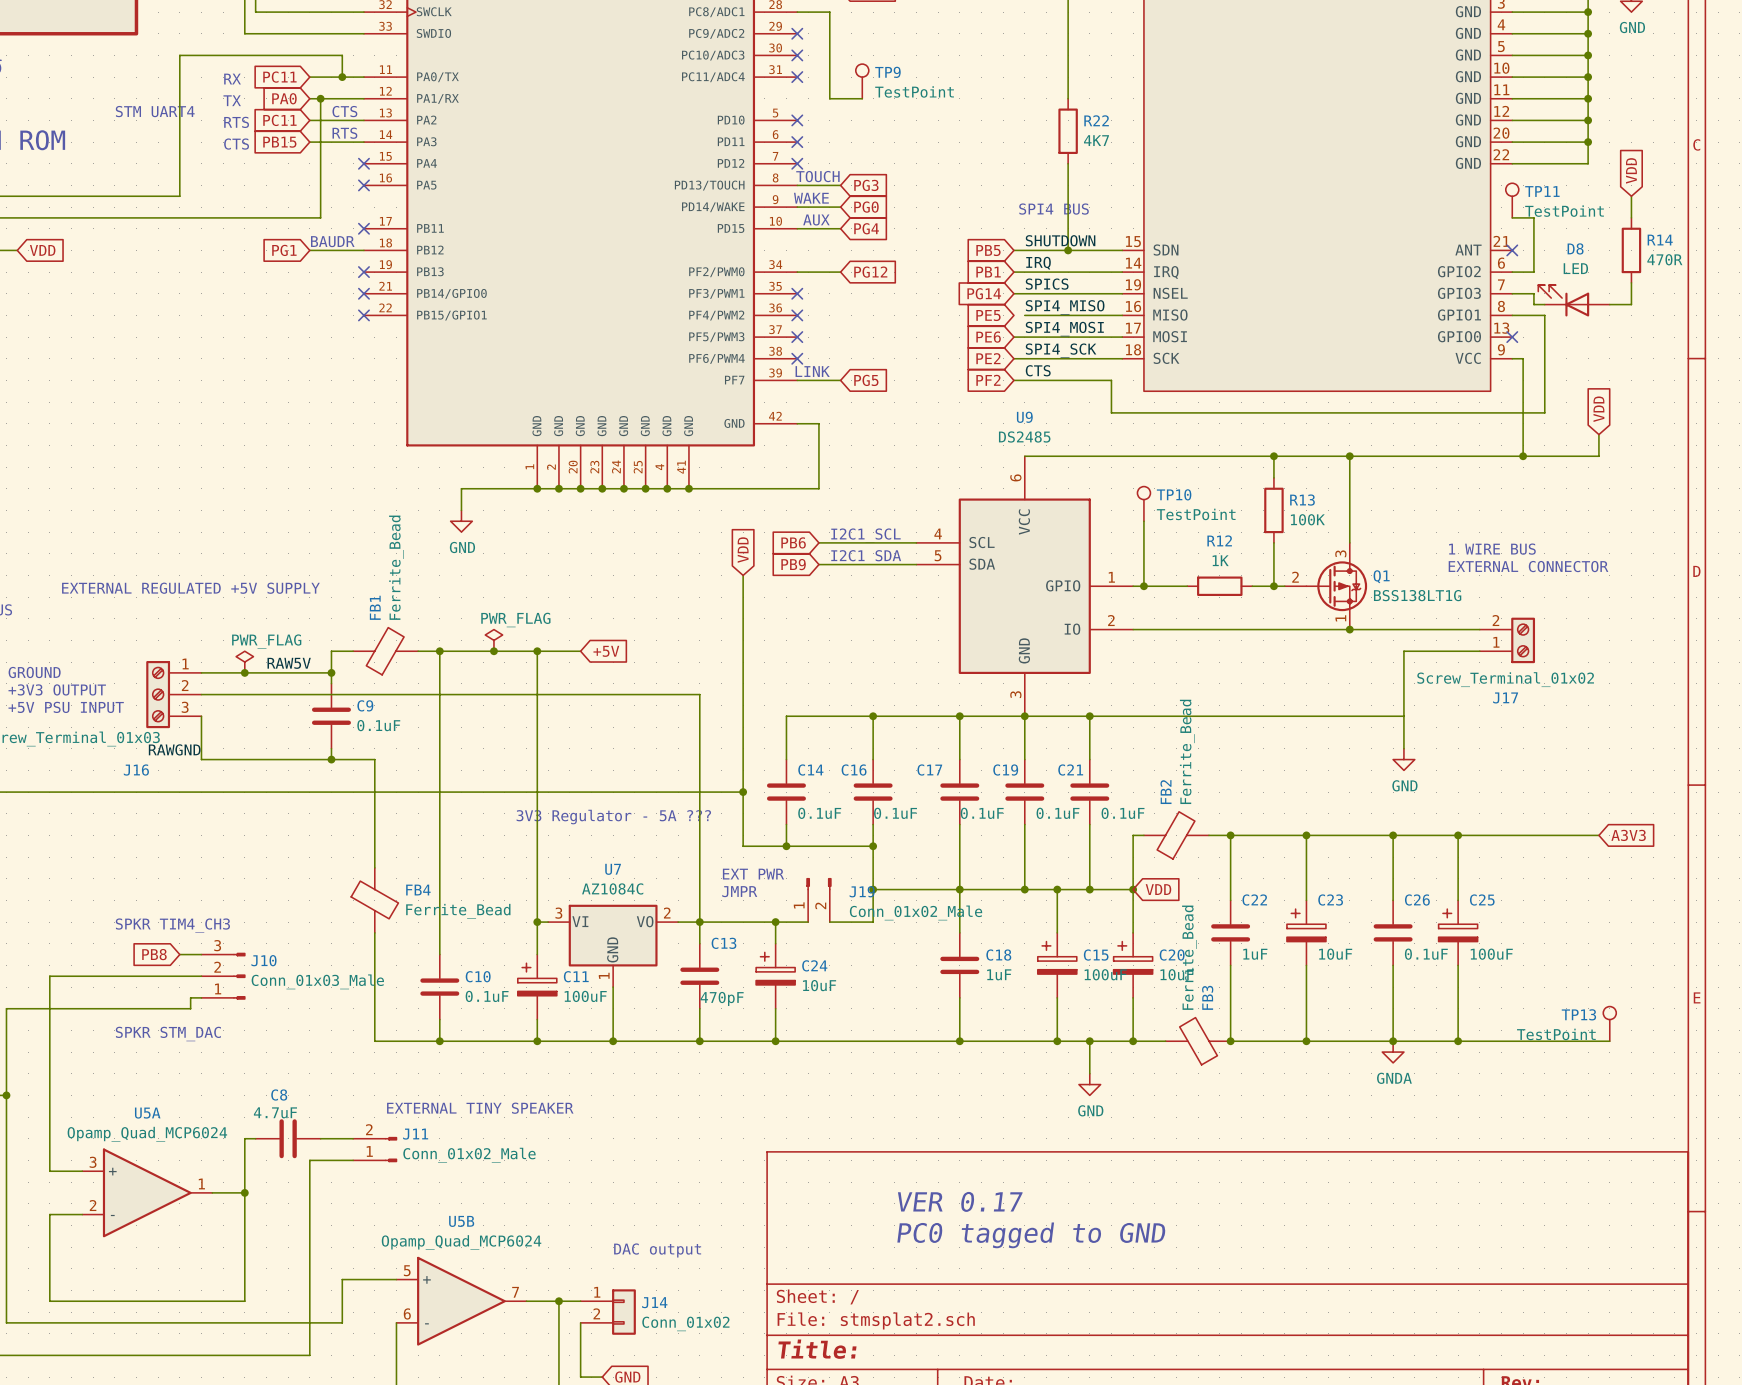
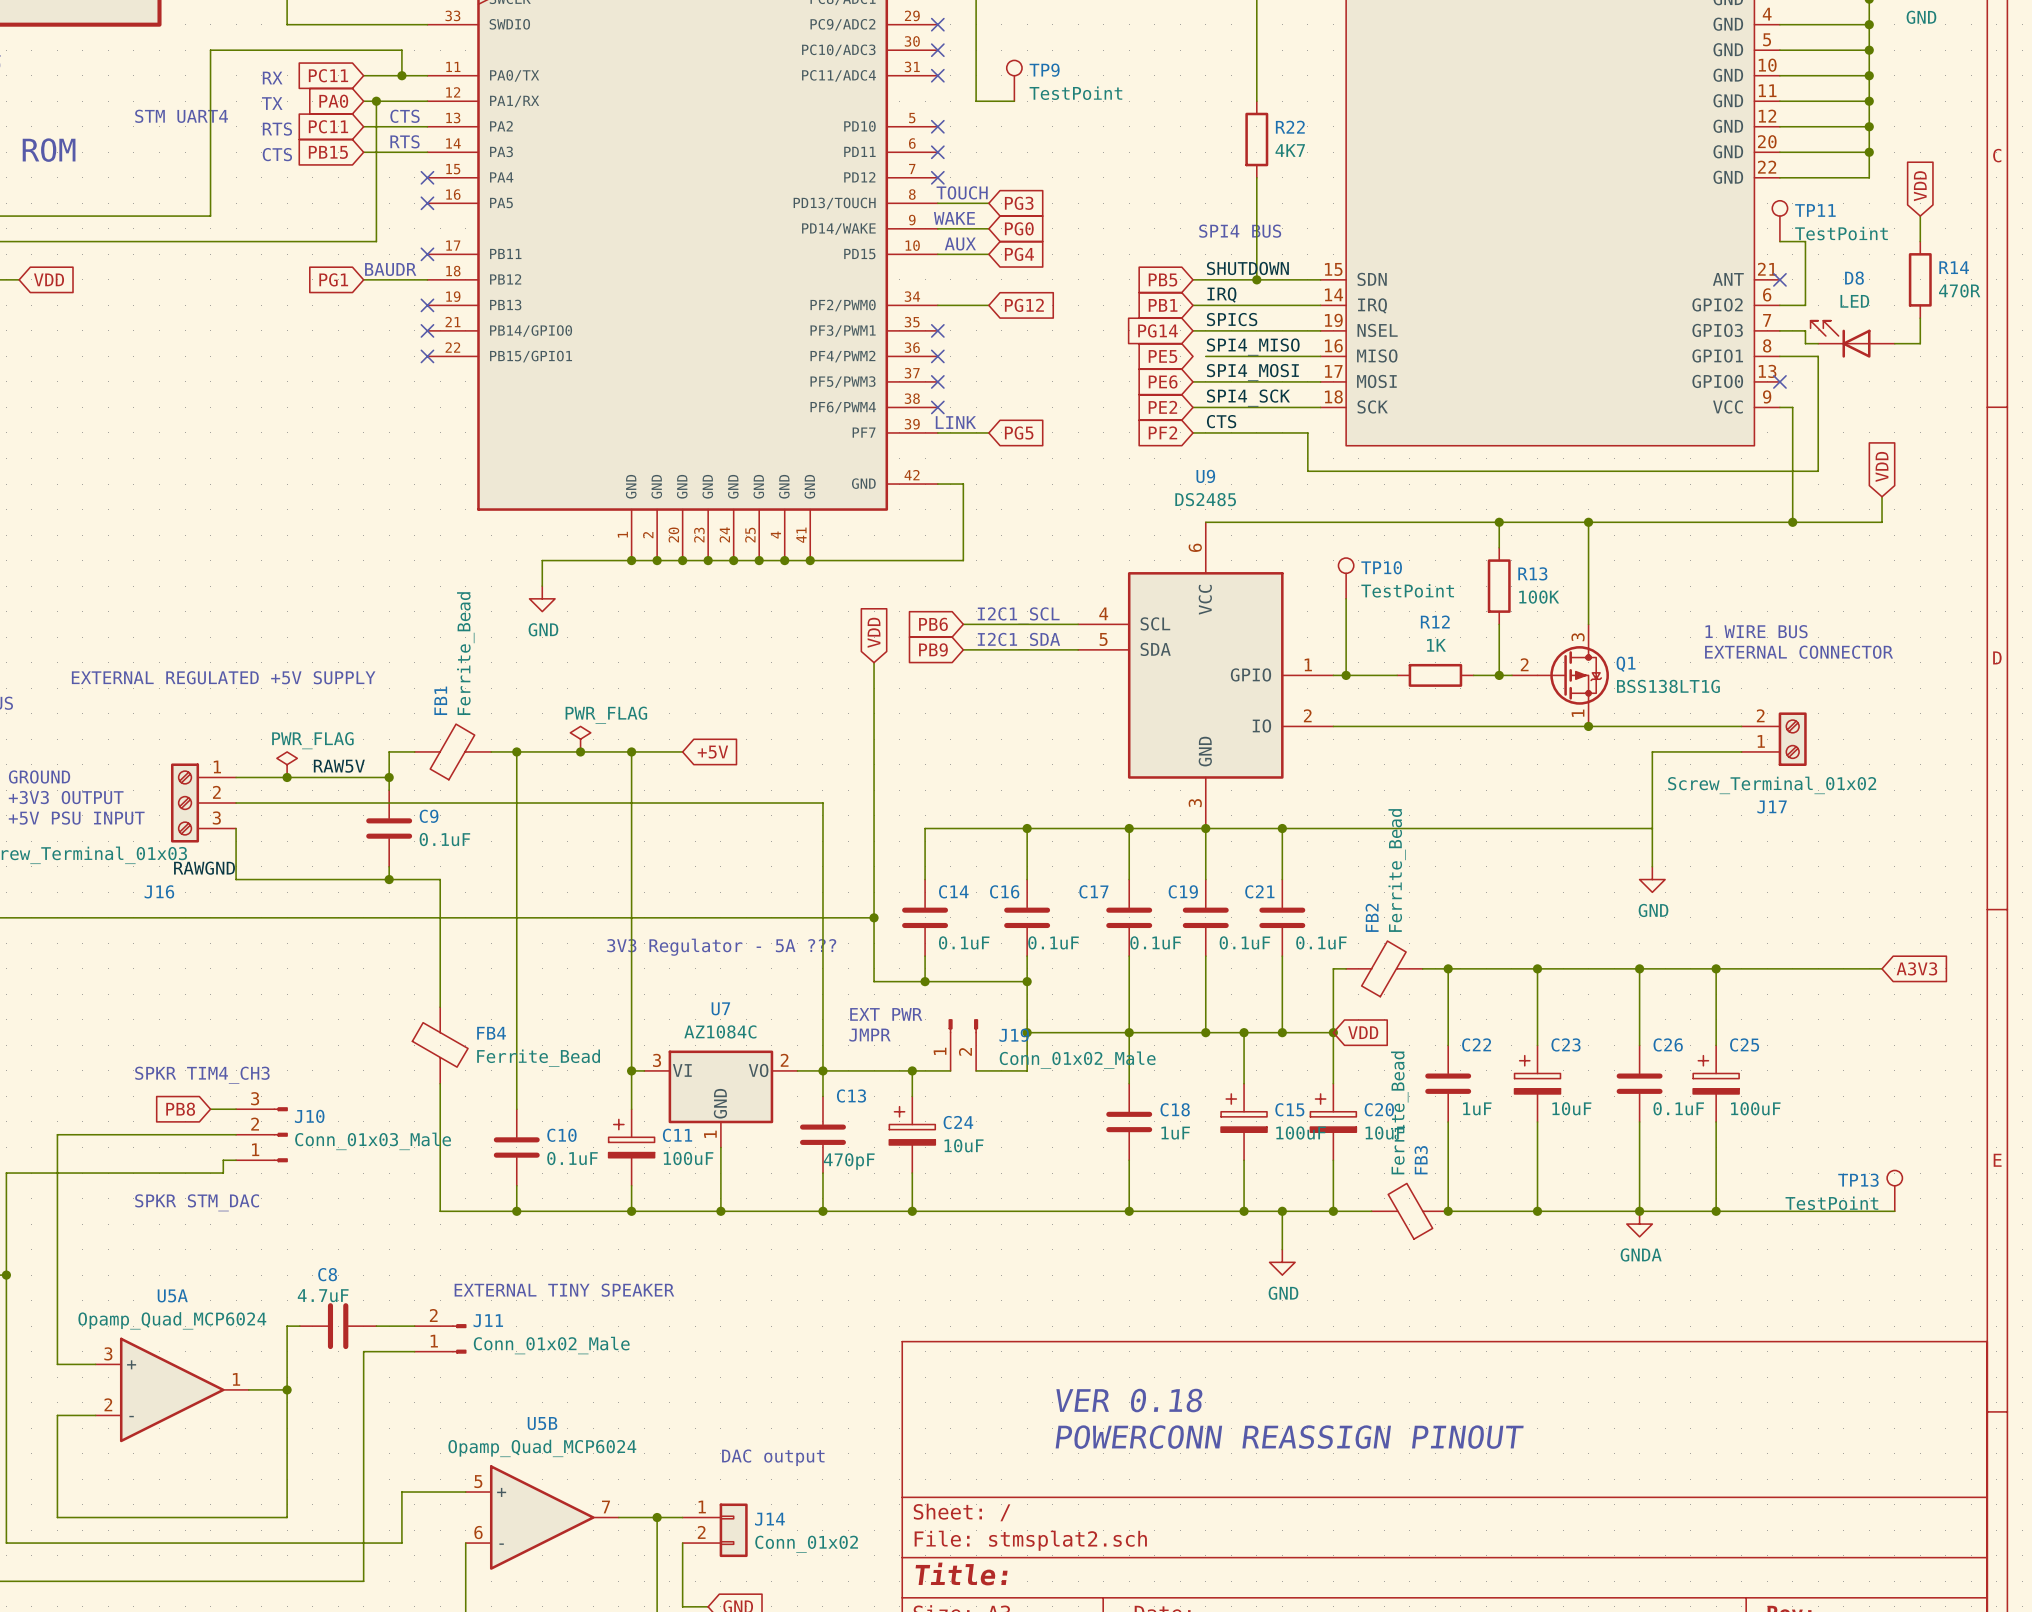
text: VER 0.17 (960, 1201) -> VER 0.18 (1129, 1400)
text: PC0 tagged to GND (1031, 1235) -> POWERCONN REASSIGN PINOUT (1289, 1437)

